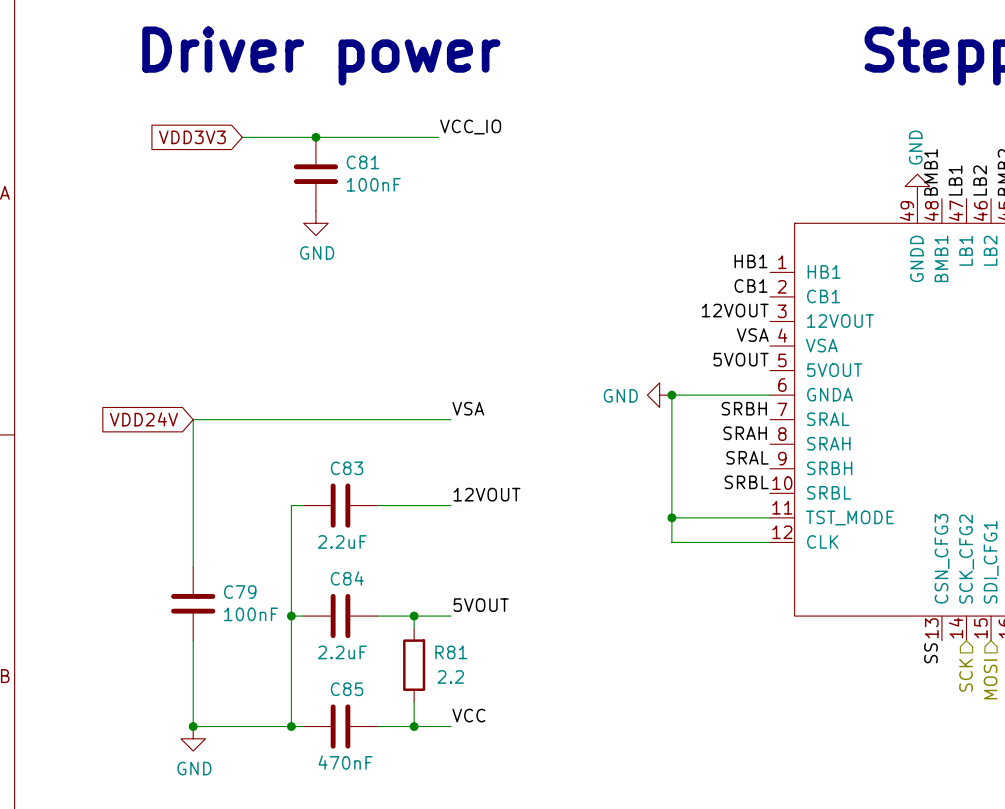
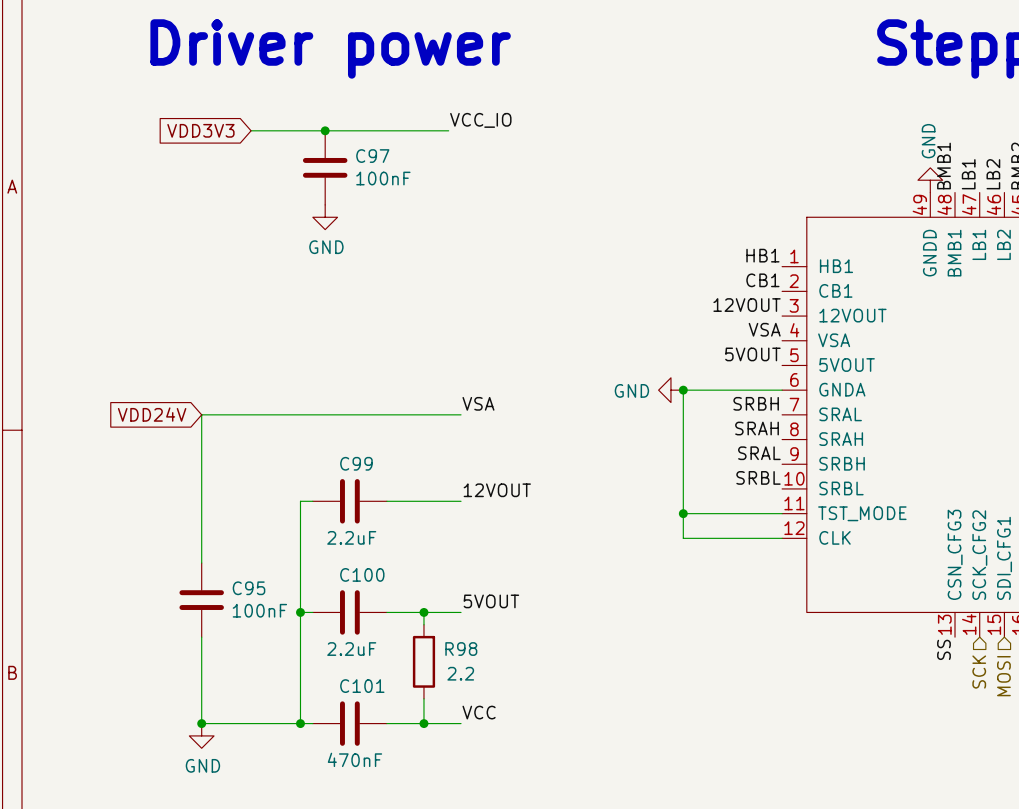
C81 name: C81 (362, 162) -> C97 (372, 156)
C83 name: C83 (347, 468) -> C99 (356, 463)
C84 name: C84 (347, 578) -> C100 (362, 574)
C79 name: C79 (240, 592) -> C95 (249, 588)
R81 name: R81 (451, 652) -> R98 (461, 649)
C85 name: C85 (347, 689) -> C101 (362, 686)

